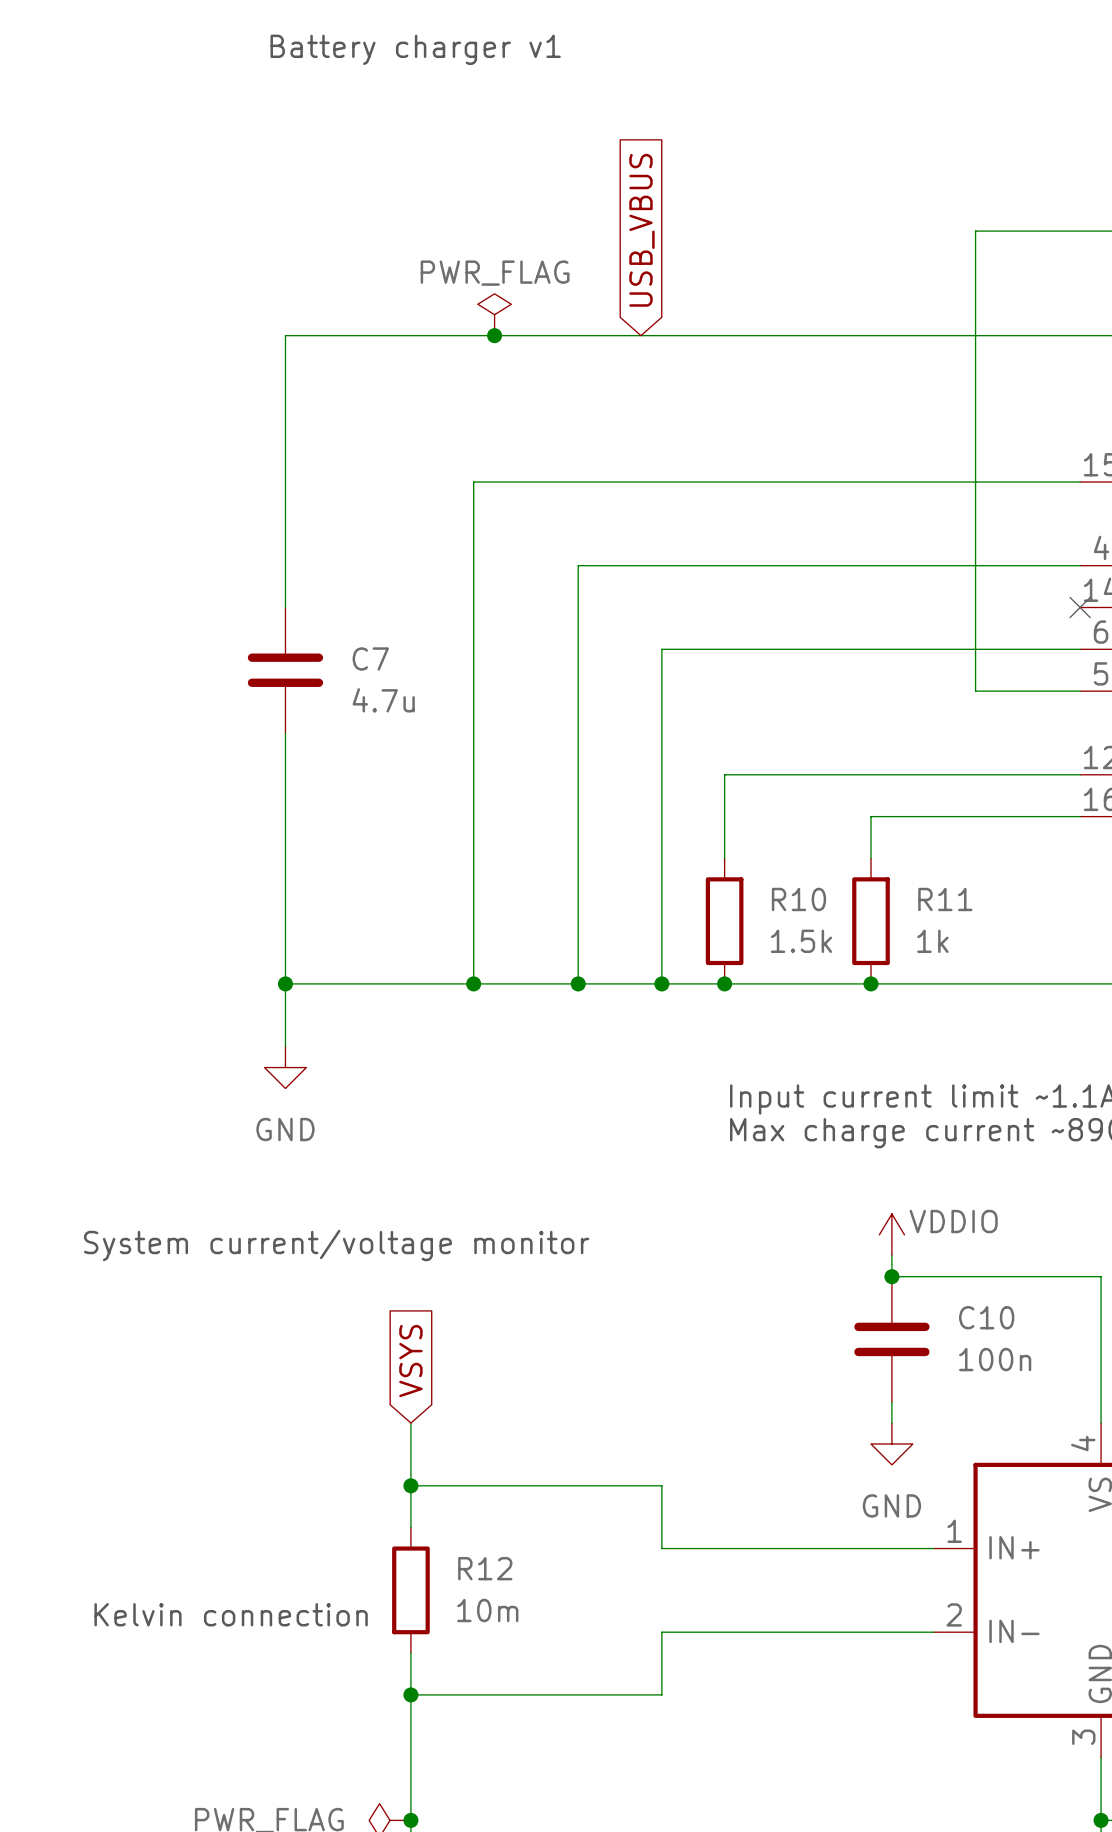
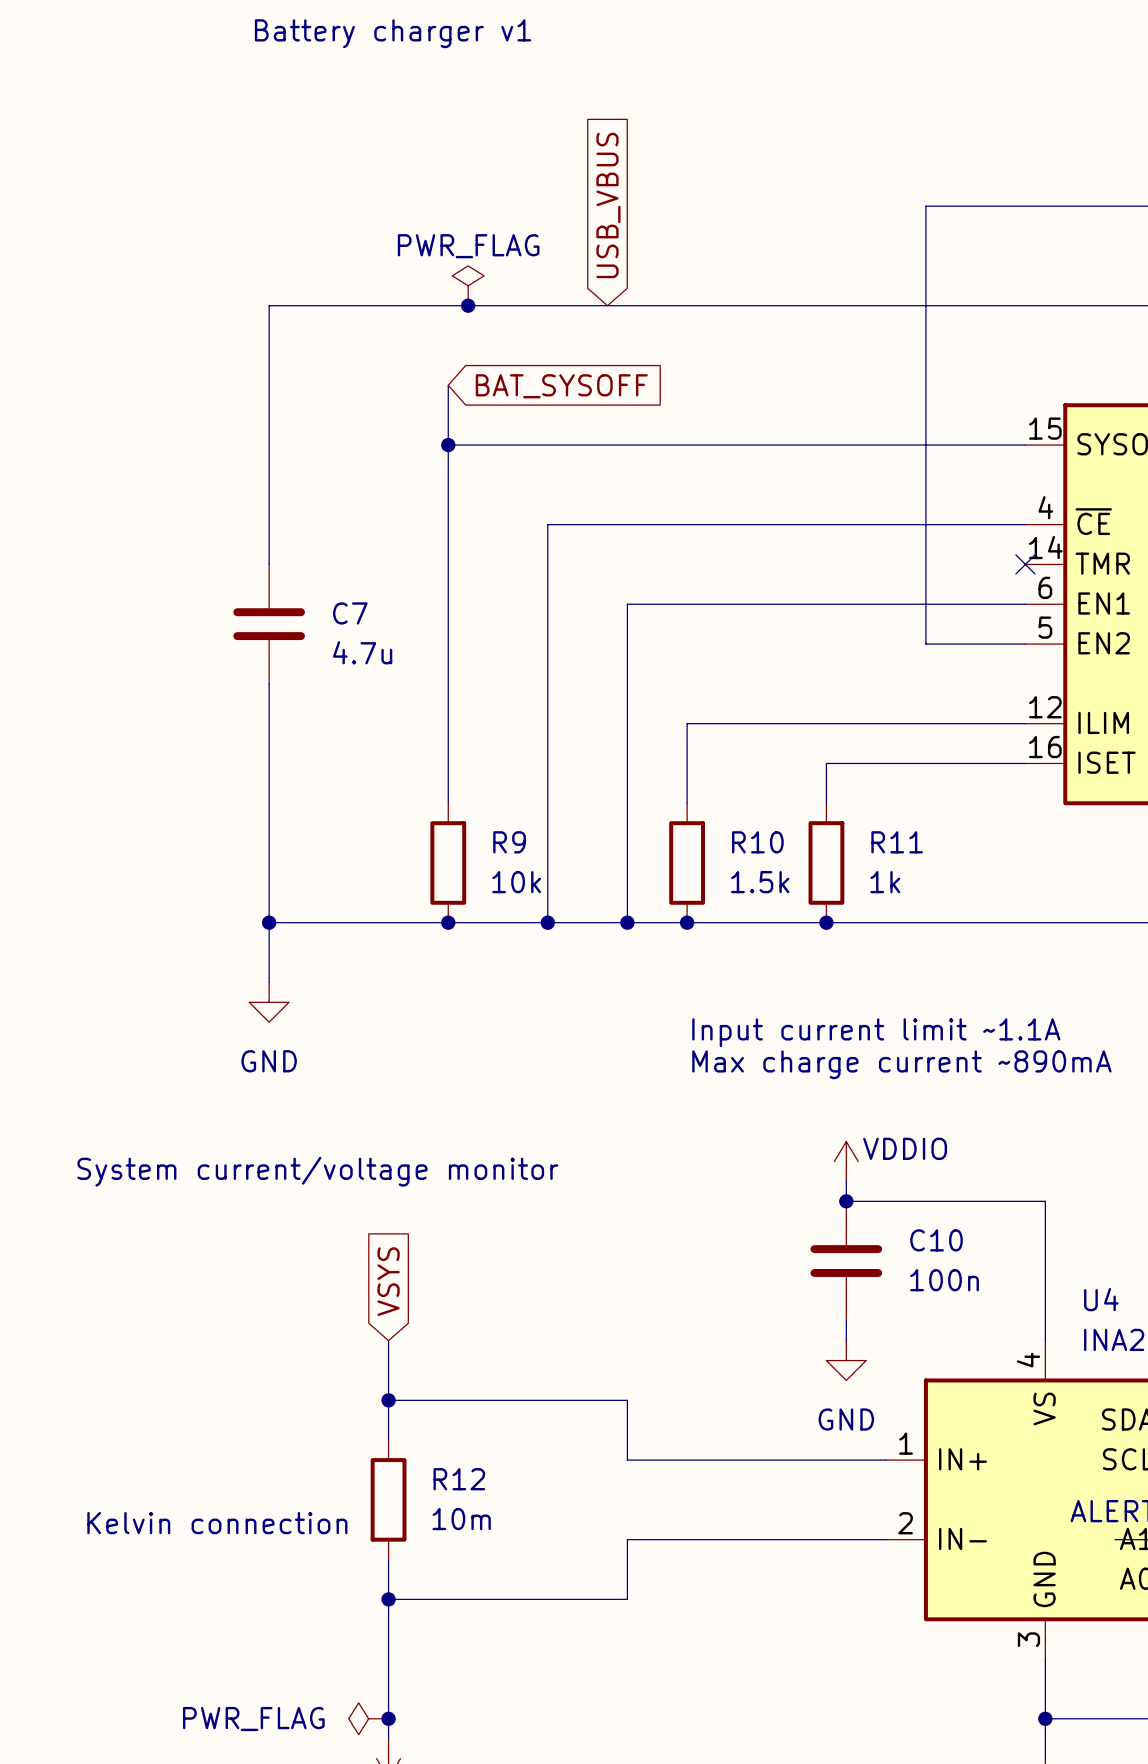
wire: none -> (448, 385) (448, 445)
global label: none -> BAT_SYSOFF (561, 386)
junction: none -> (448, 445)
wire: (473, 858) (473, 983) -> none
R9: none -> 10k (448, 862)

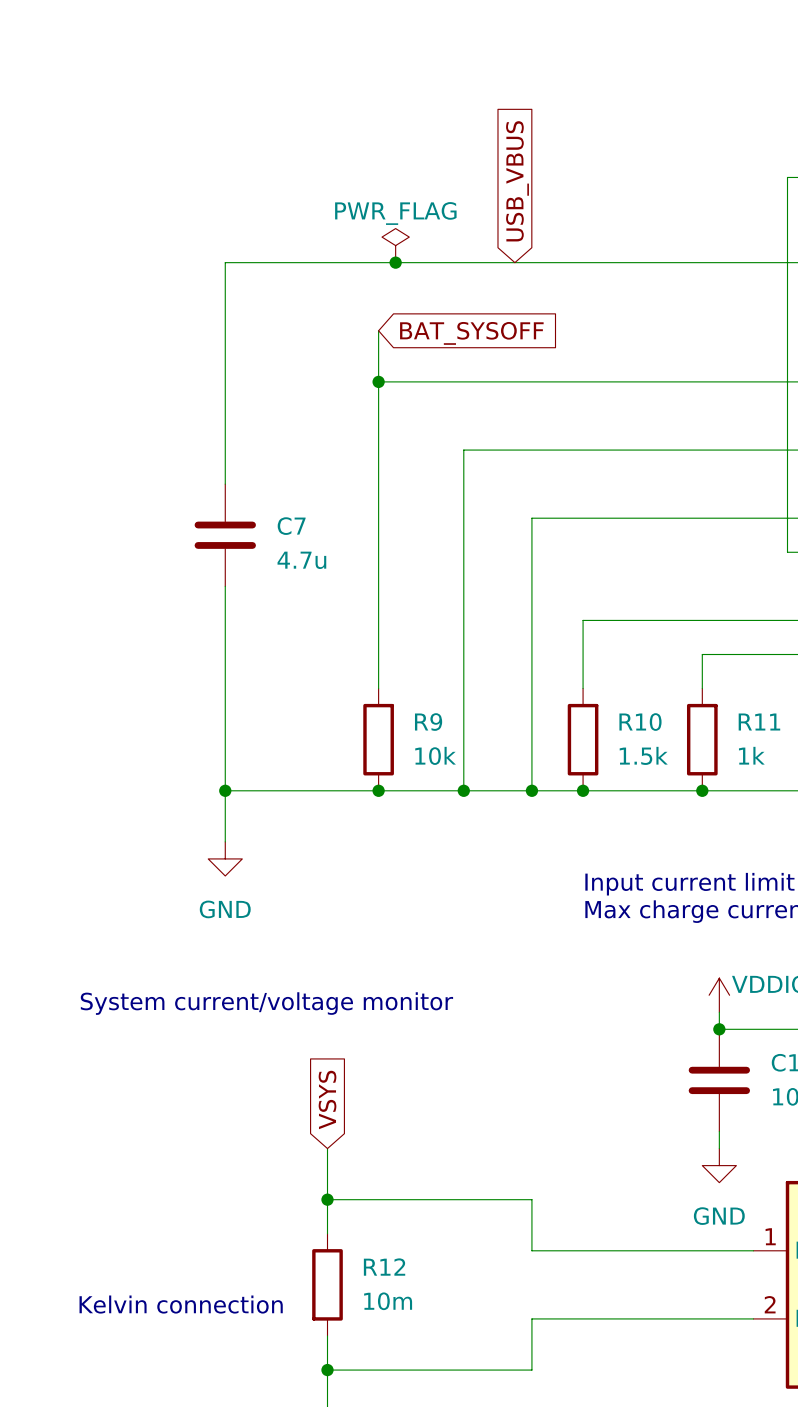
text: Battery charger v1 (393, 33) -> none

